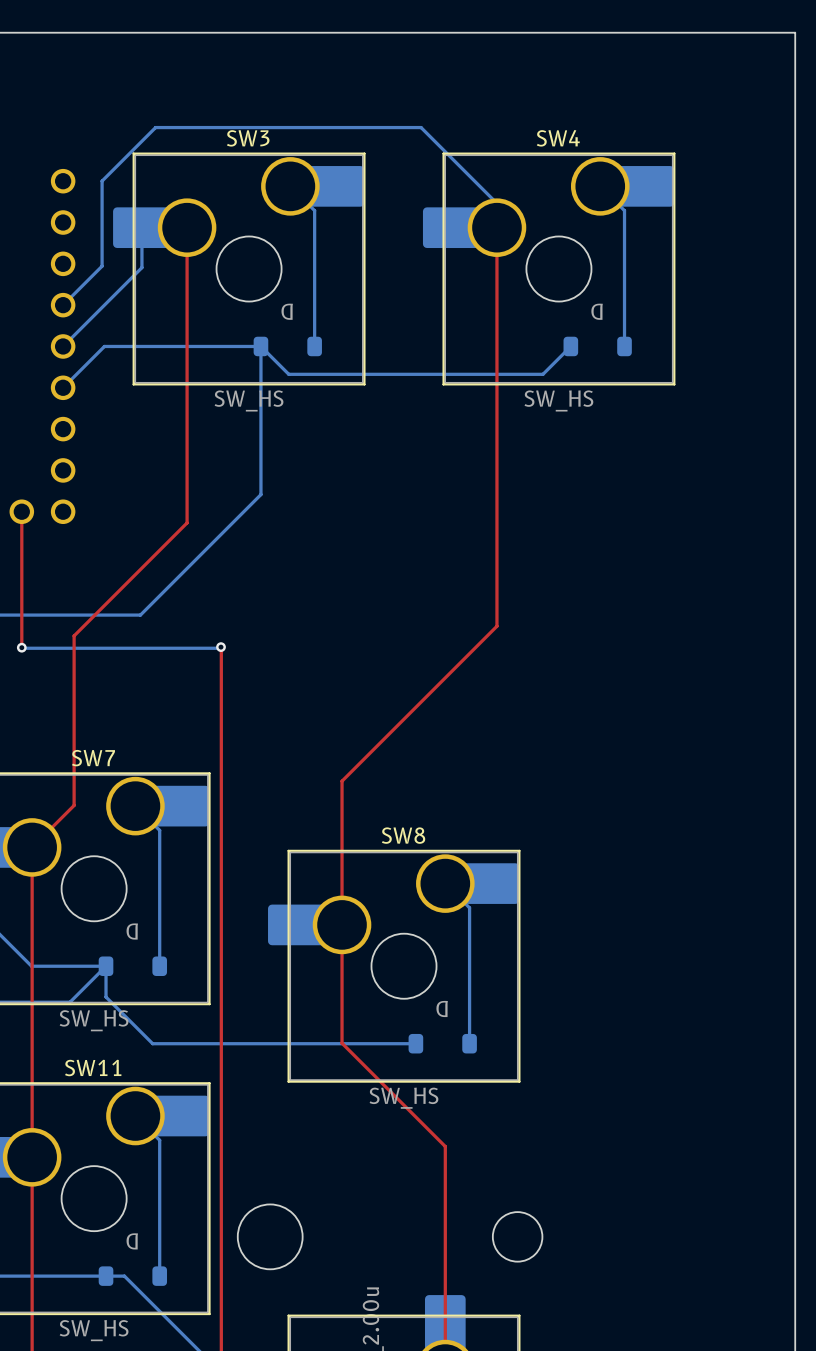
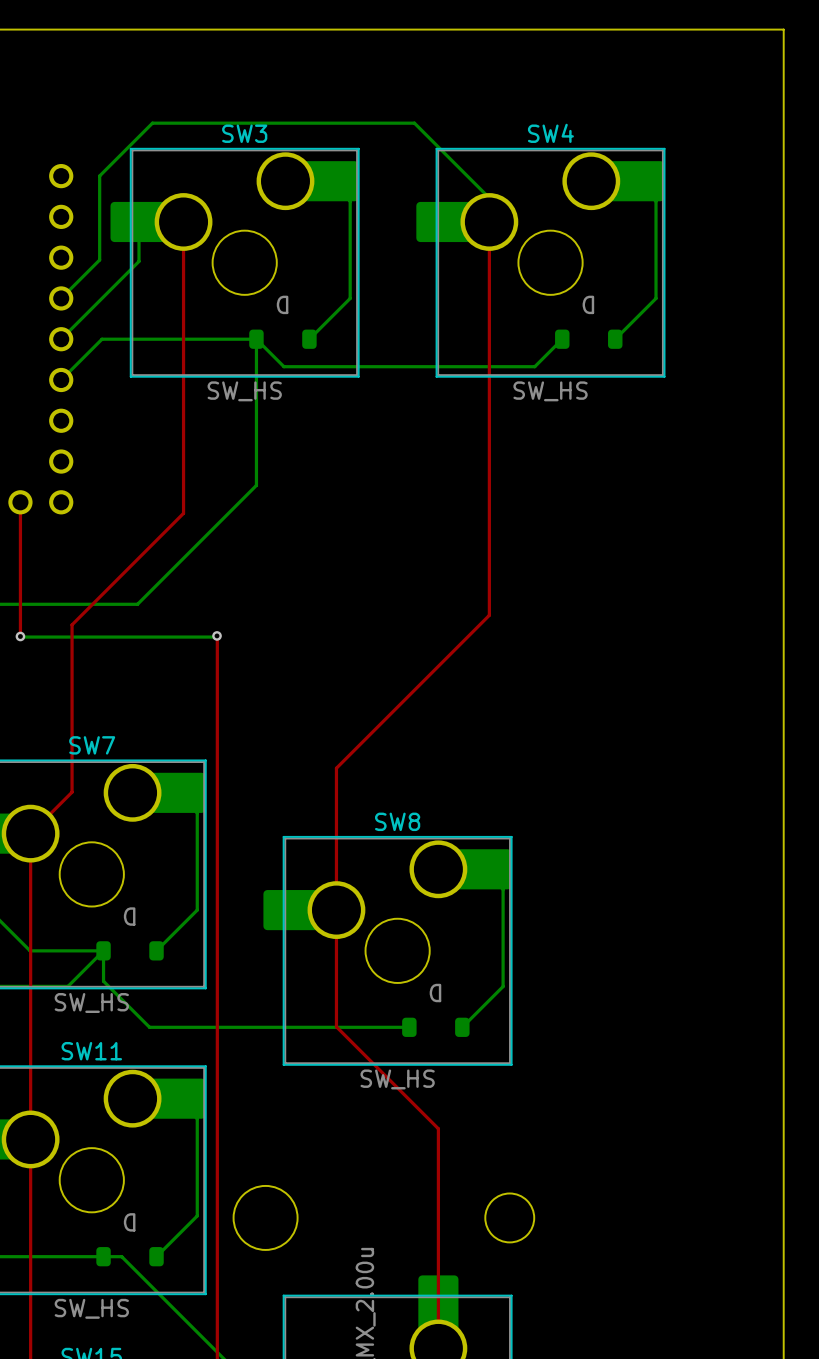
bottom track: (290, 186) (314, 210) (314, 346) -> (330, 181) (350, 201) (350, 298) (309, 339)
bottom track: (600, 186) (624, 210) (624, 346) -> (635, 181) (656, 201) (656, 298) (615, 339)
bottom track: (135, 806) (159, 830) (159, 966) -> (177, 792) (197, 812) (197, 910) (156, 950)
bottom track: (445, 883) (469, 907) (469, 1043) -> (483, 869) (503, 889) (503, 986) (462, 1027)
bottom track: (135, 1116) (159, 1140) (159, 1276) -> (177, 1098) (197, 1118) (197, 1215) (156, 1256)

